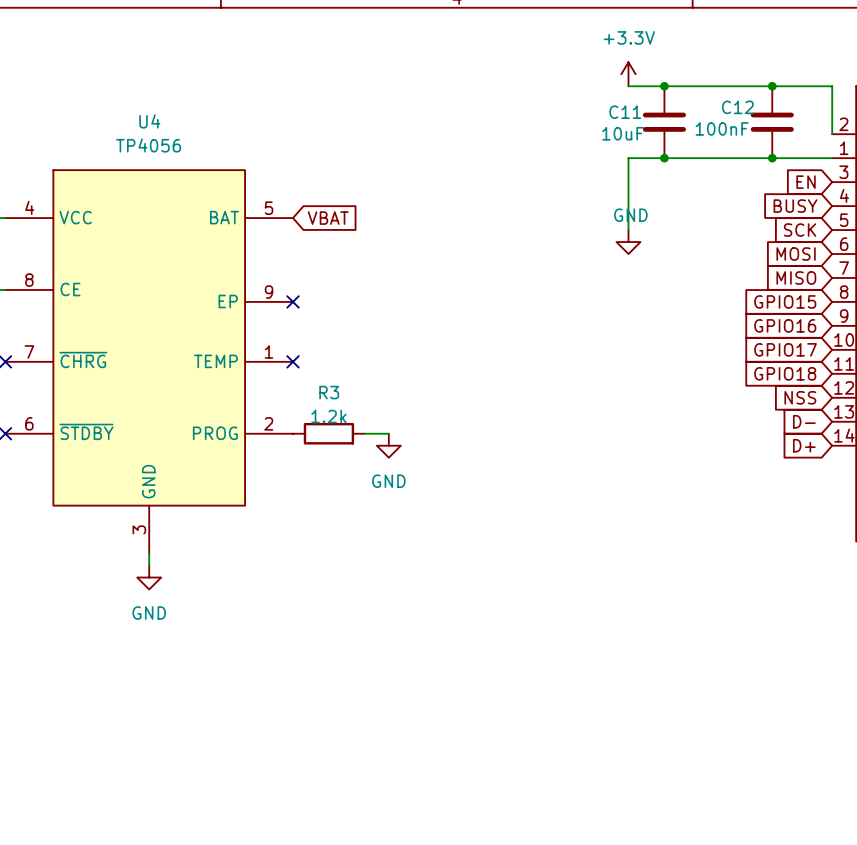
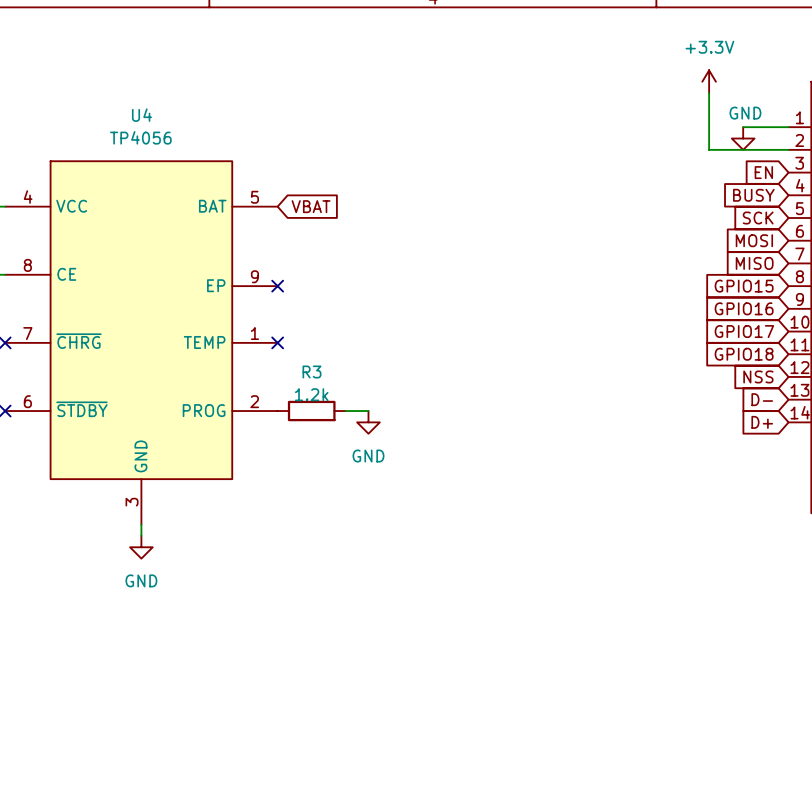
power symbol position: +3.3V (628, 74) -> +3.3V (709, 81)
wire: (628, 86) (832, 86) (832, 134) -> (743, 127) (788, 127)
junction: (664, 86) -> none
junction: (772, 86) -> none
C11: 10uF (664, 122) -> none
C12: 100nF (772, 122) -> none
part pin number: 2 (843, 124) -> 1 (799, 117)
part pin number: 1 (844, 148) -> 2 (799, 140)
junction: (664, 158) -> none
wire: (748, 158) (628, 158) (628, 230) -> (709, 149) (709, 93)
junction: (772, 158) -> none
power symbol position: GND (628, 242) -> GND (743, 138)

